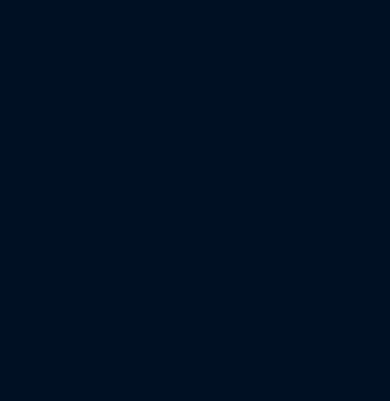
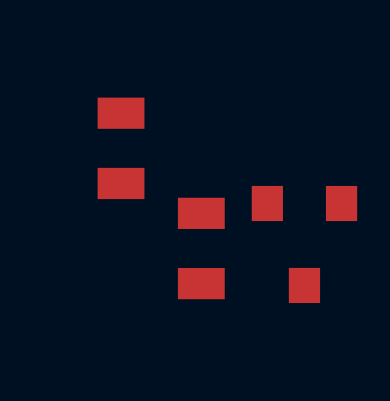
part: none -> (121, 148)
part: none -> (304, 244)
part: none -> (201, 248)

